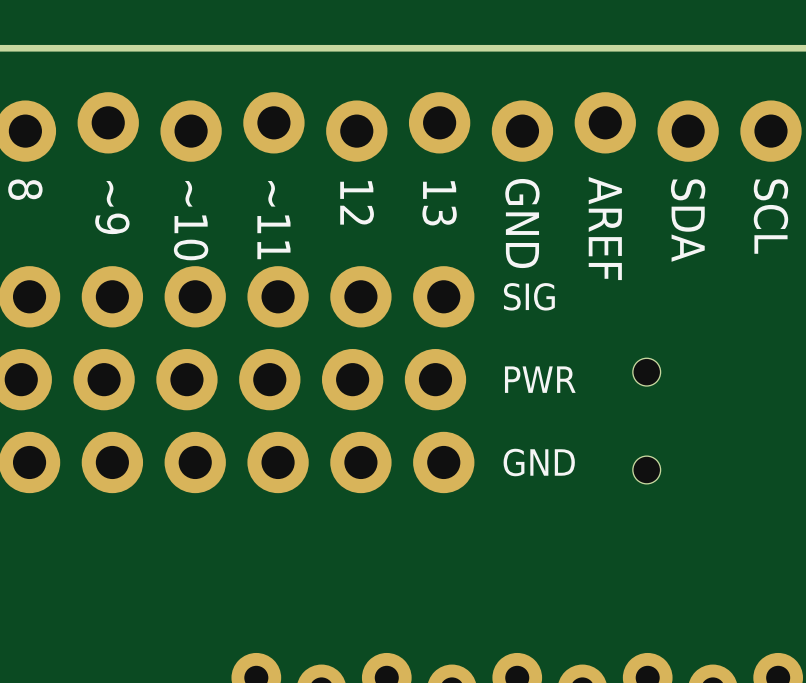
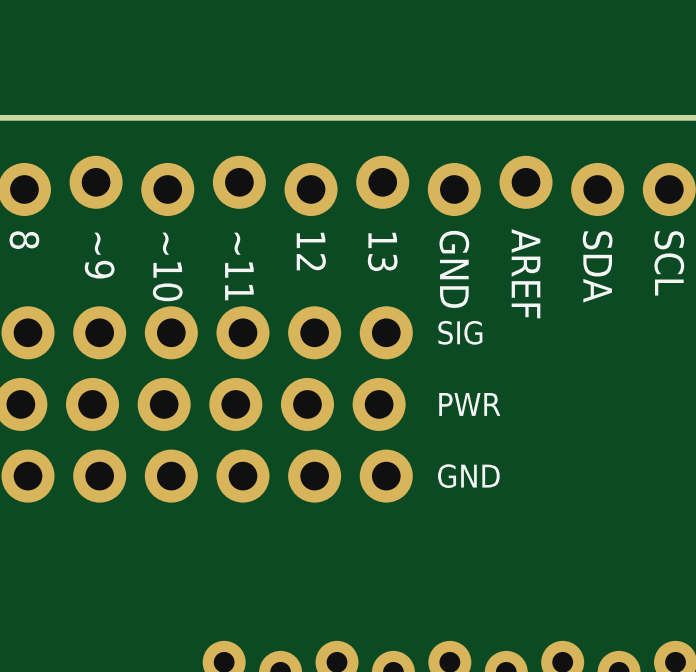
part: (646, 421) -> none

